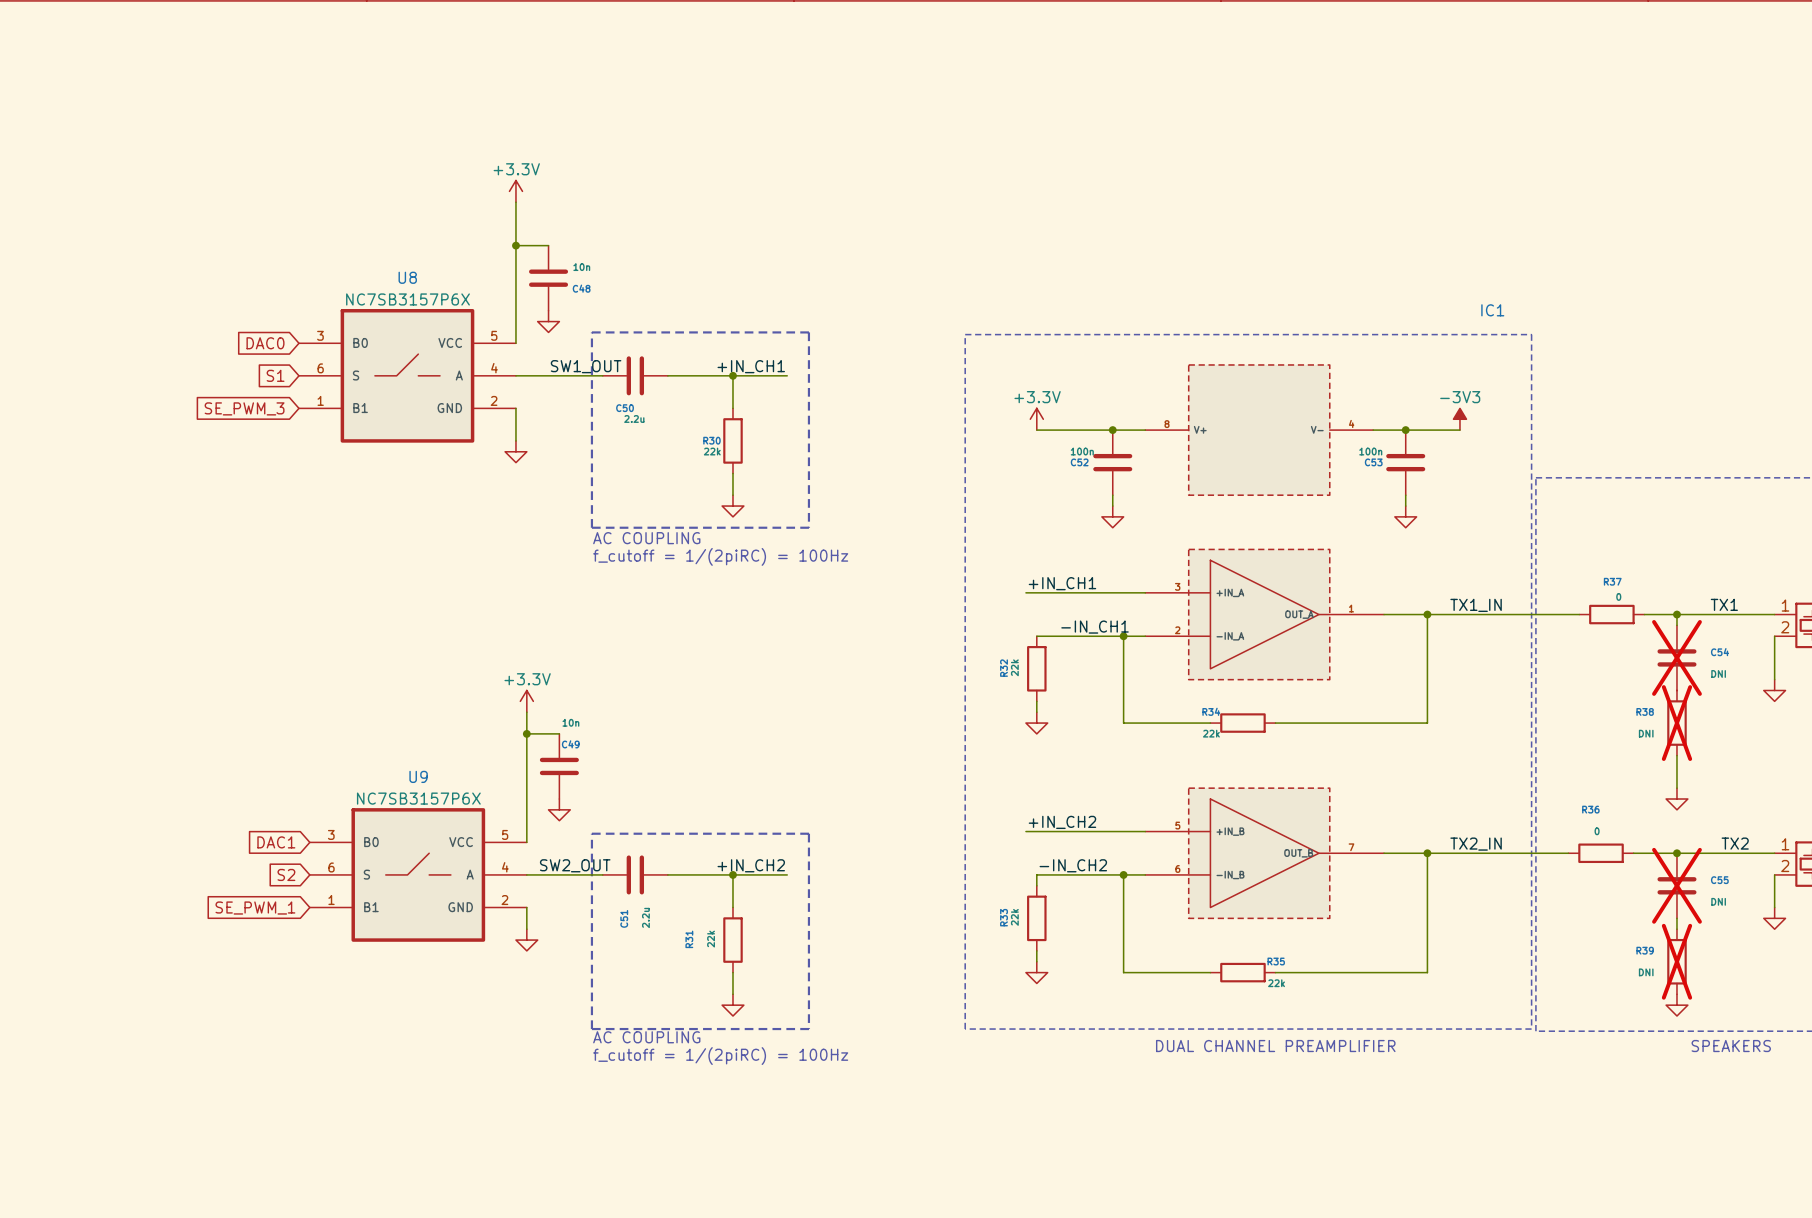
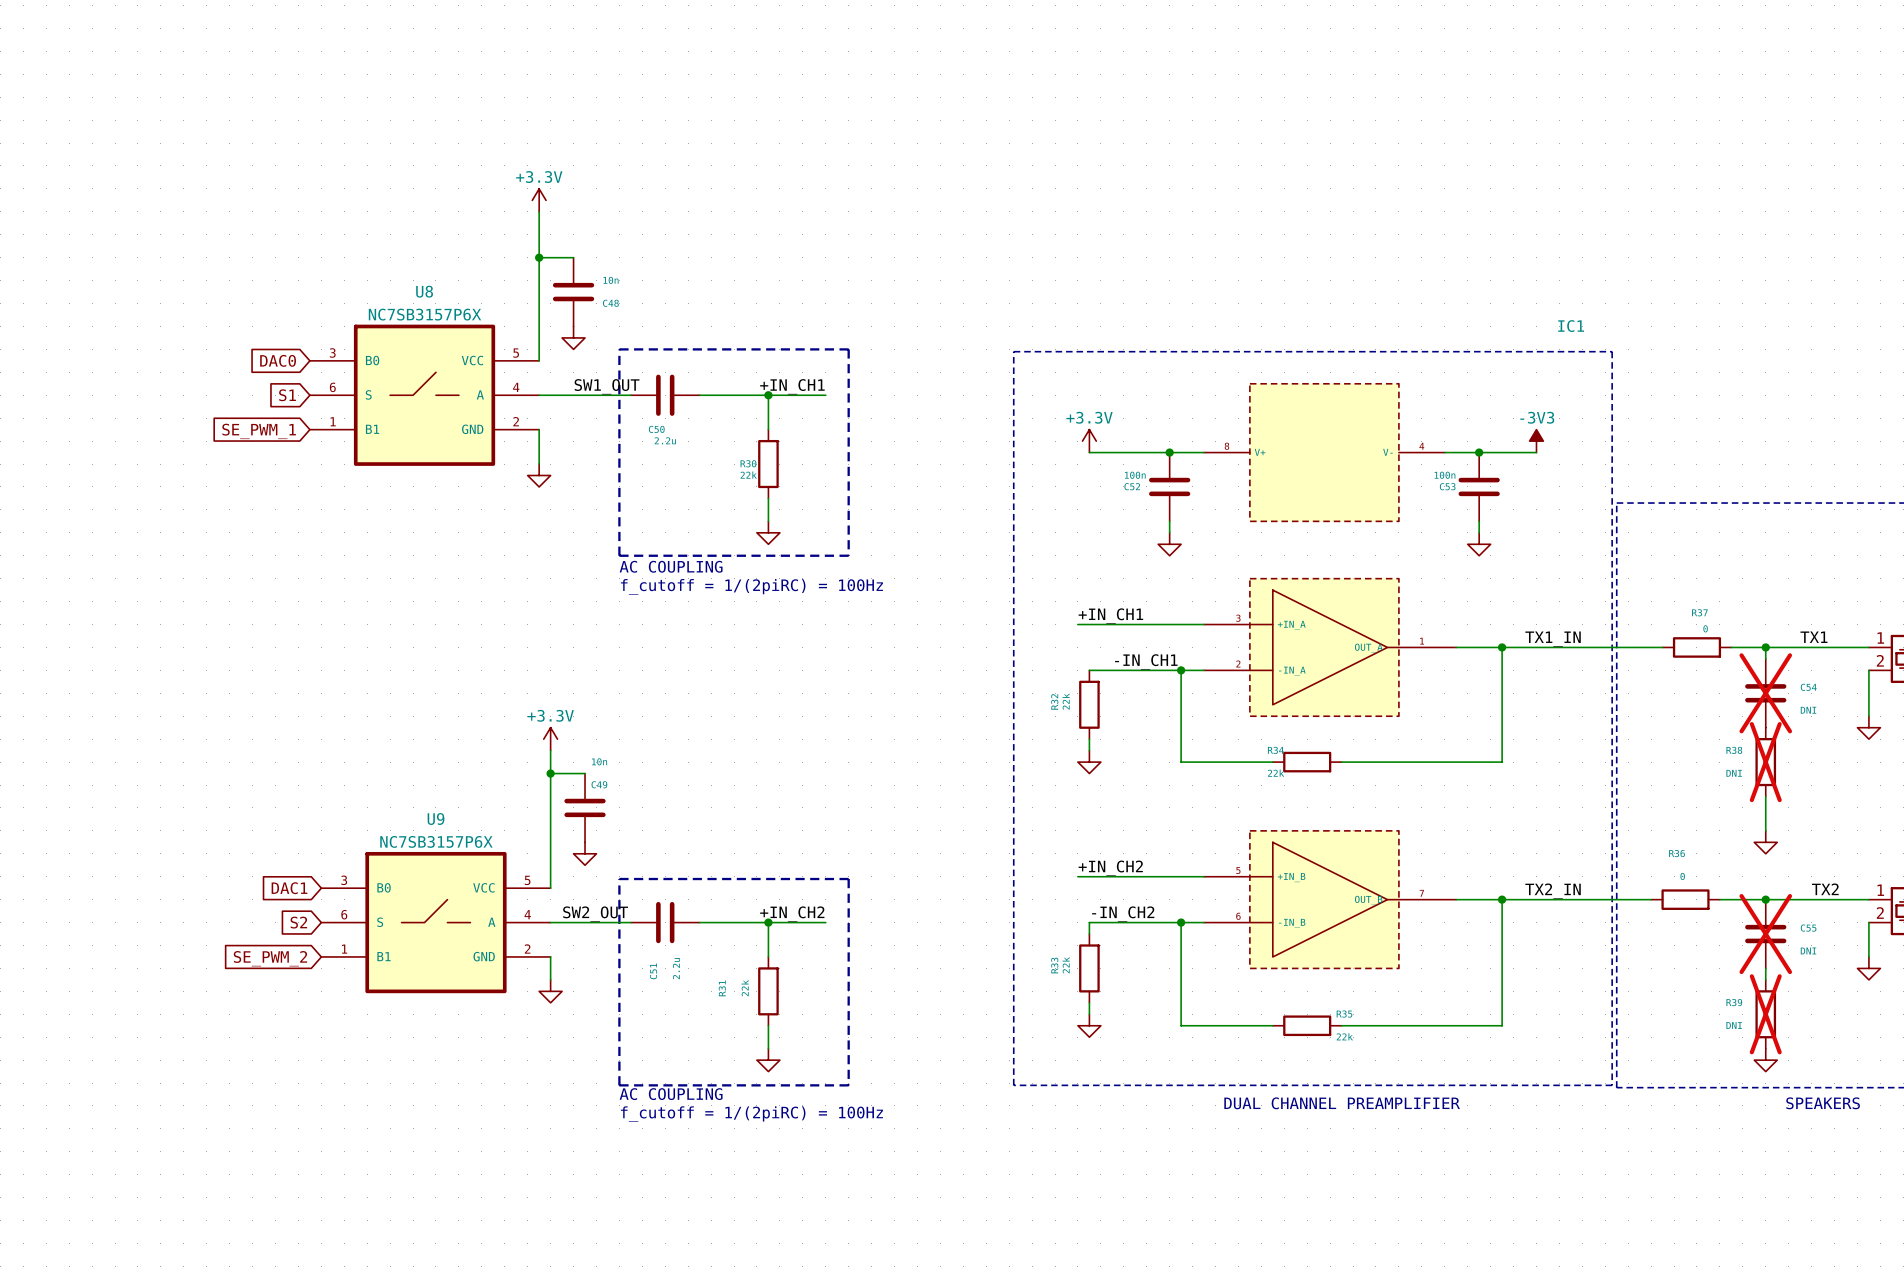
global label: SE_PWM_3 (244, 408) -> SE_PWM_1 (259, 431)
global label: SE_PWM_1 (255, 908) -> SE_PWM_2 (270, 958)

